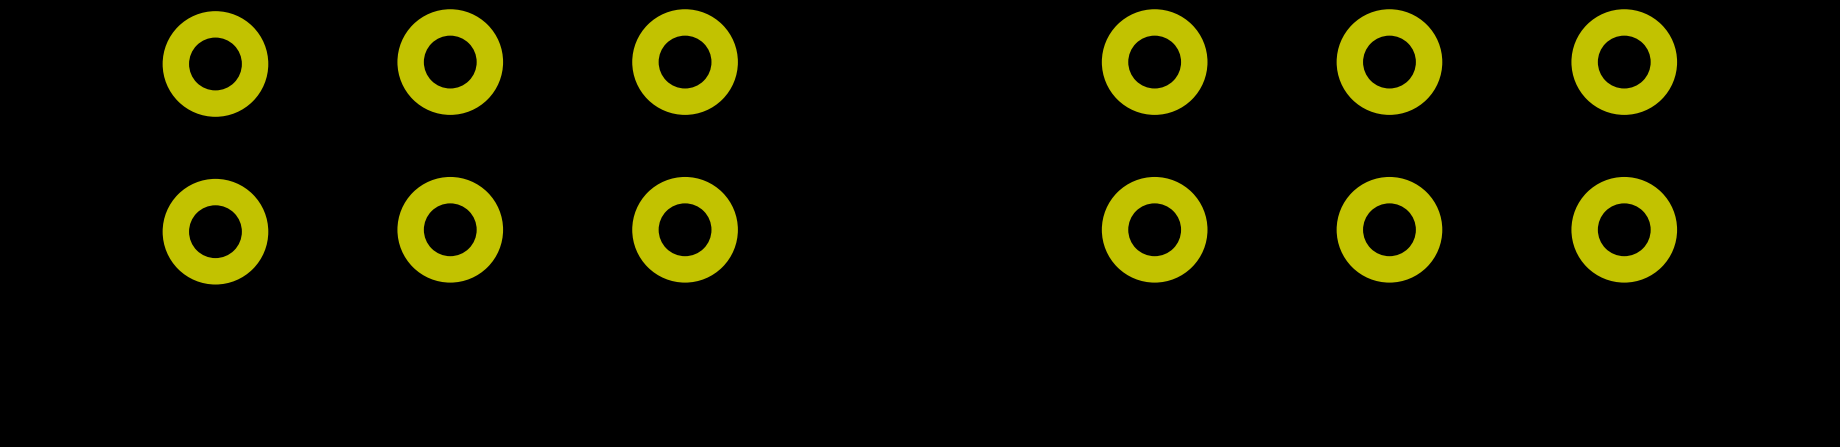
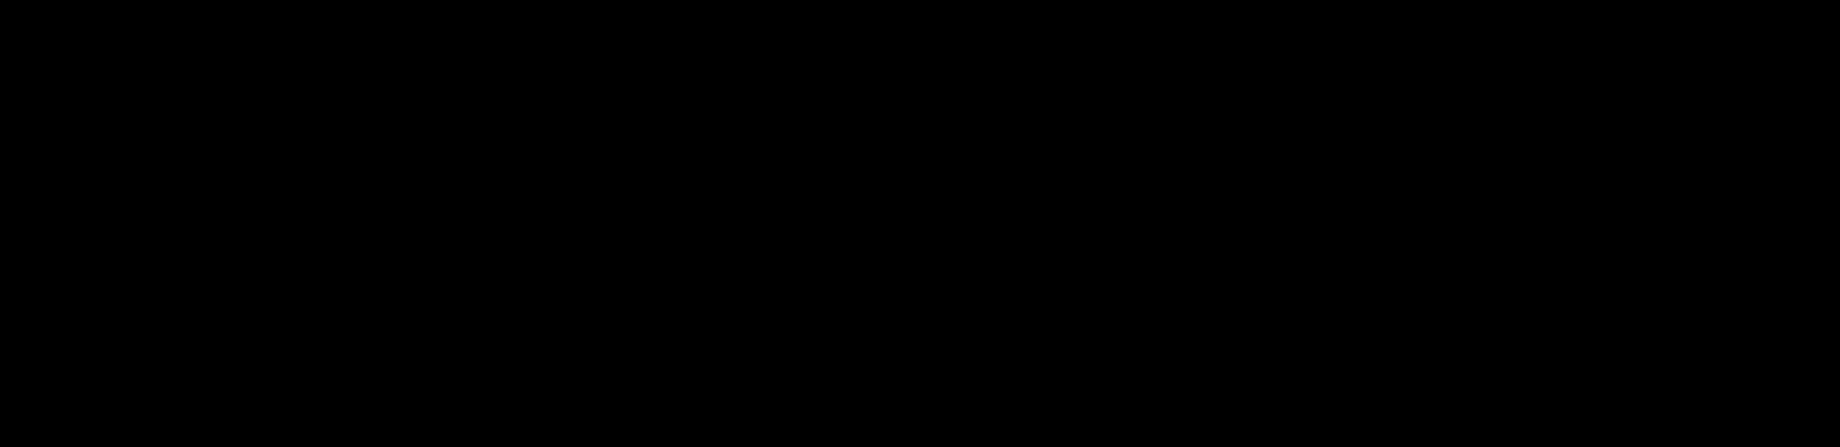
part: (450, 145) -> none
part: (685, 145) -> none
part: (1154, 145) -> none
part: (1389, 145) -> none
part: (1624, 145) -> none
part: (215, 147) -> none

